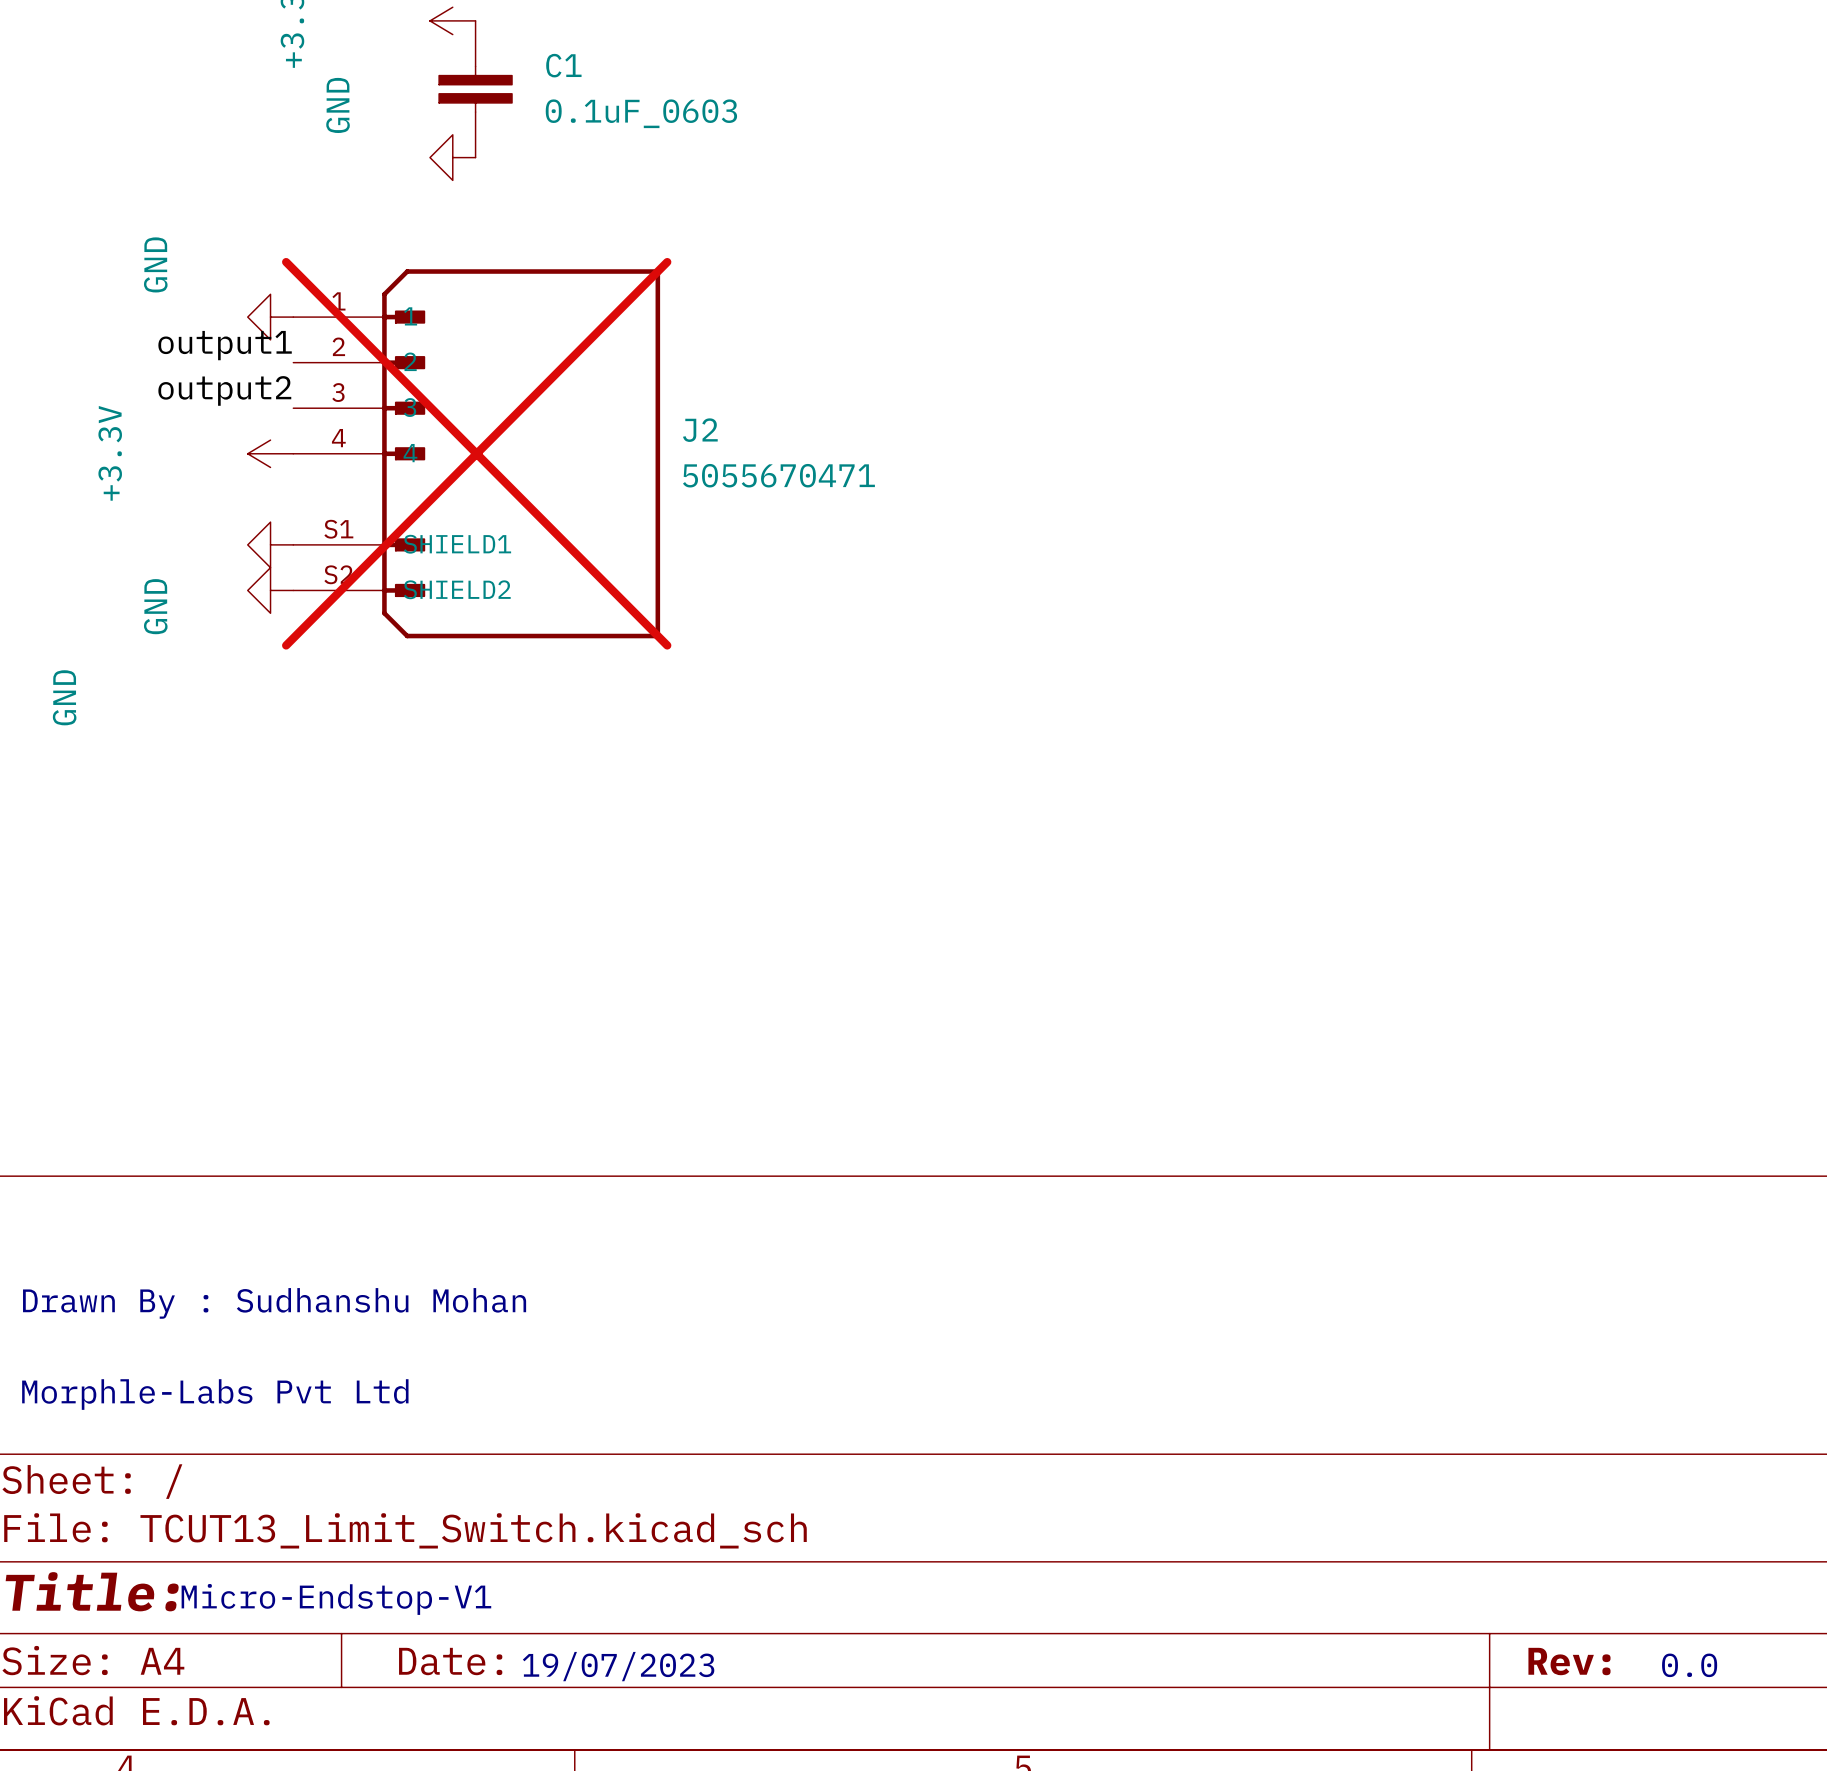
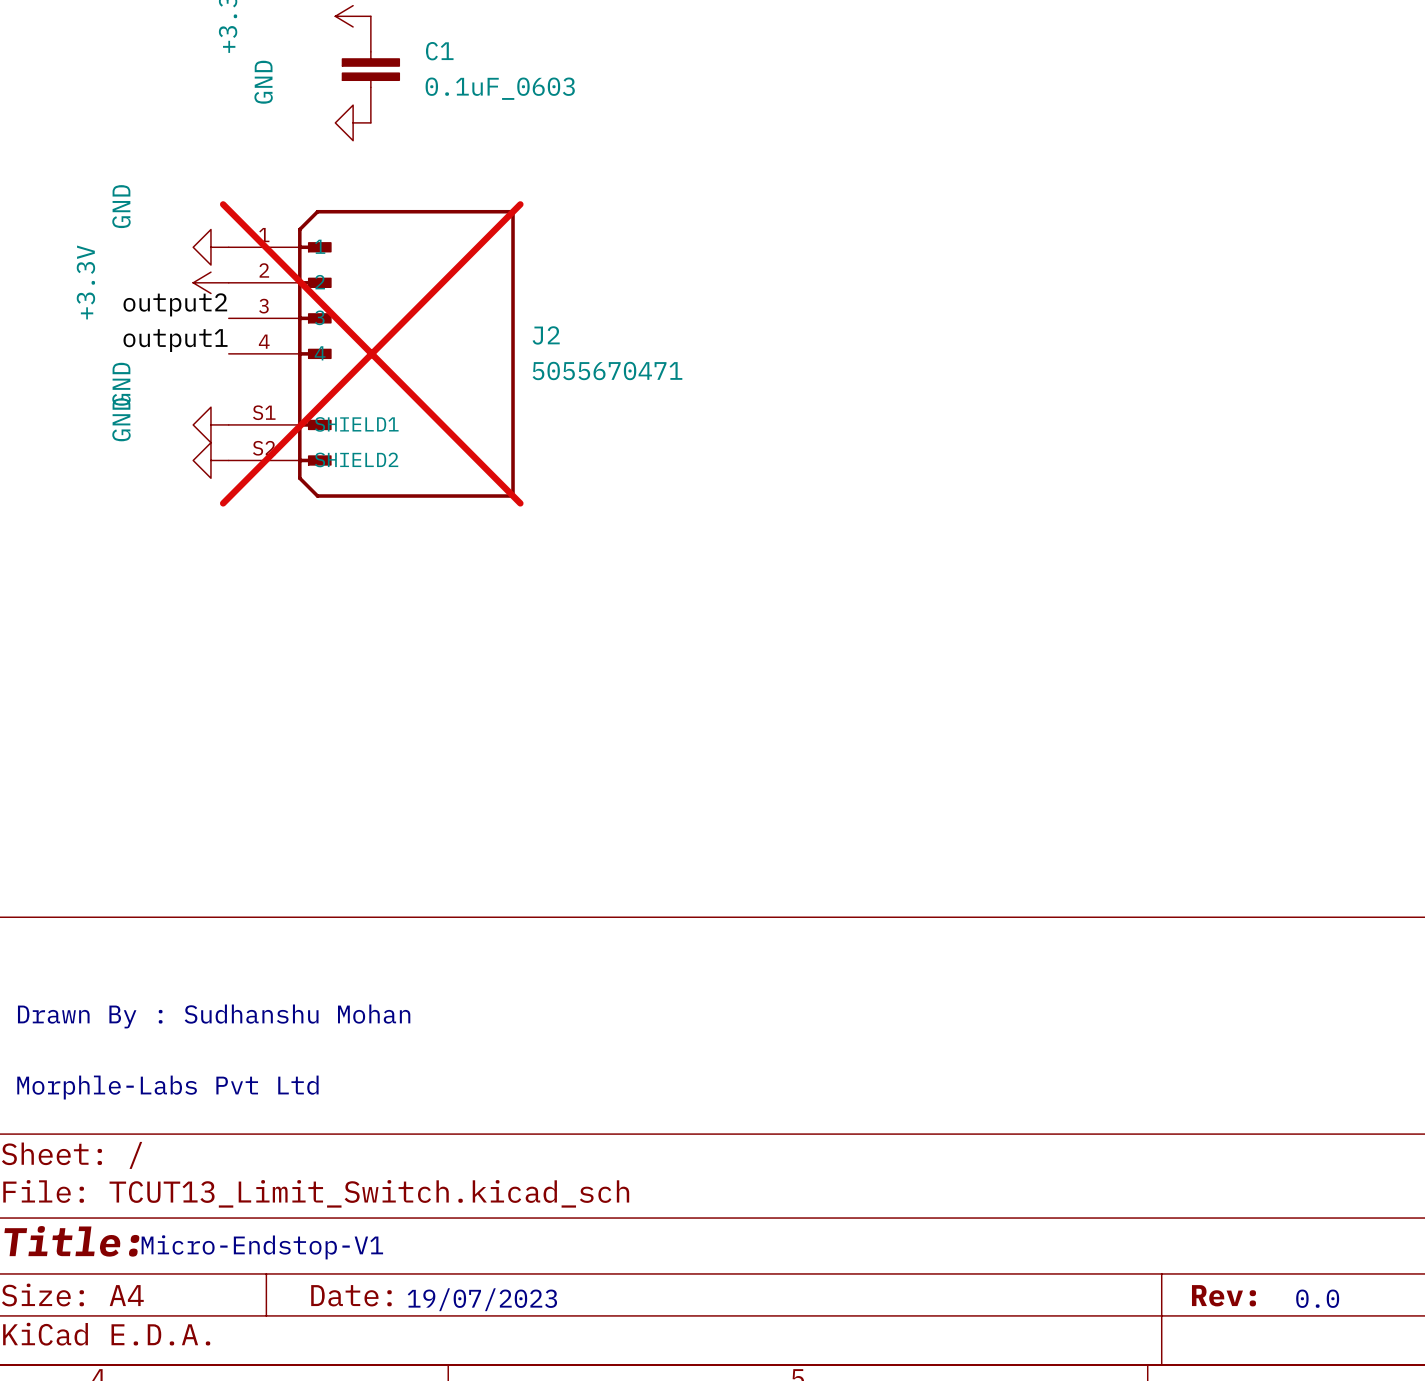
label position: output1 (225, 345) -> output1 (175, 340)
power symbol position: +3.3V (270, 453) -> +3.3V (210, 282)
power symbol text position: GND (155, 606) -> GND (121, 384)
power symbol text position: GND (64, 697) -> GND (121, 419)

